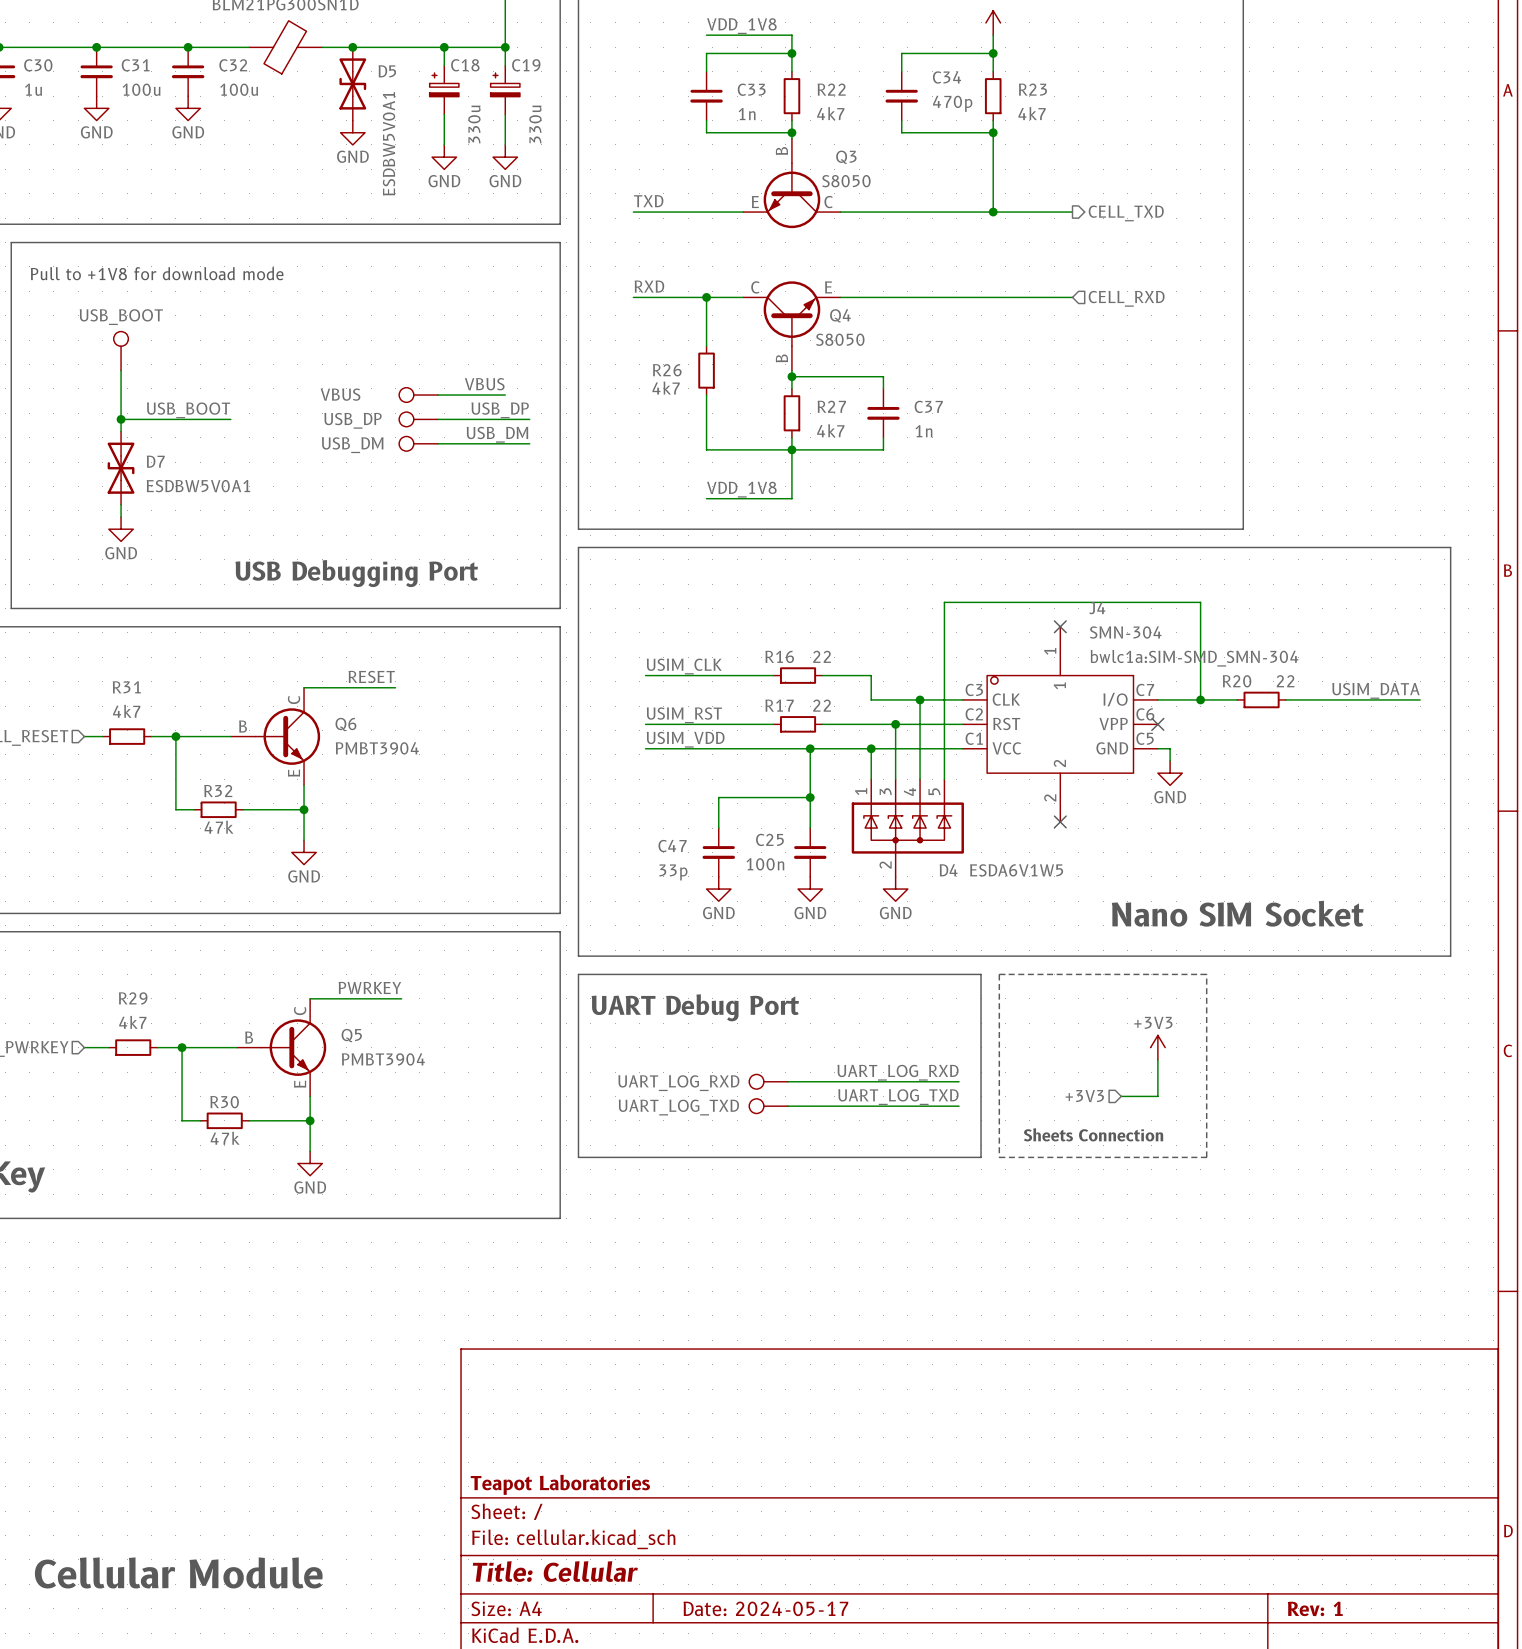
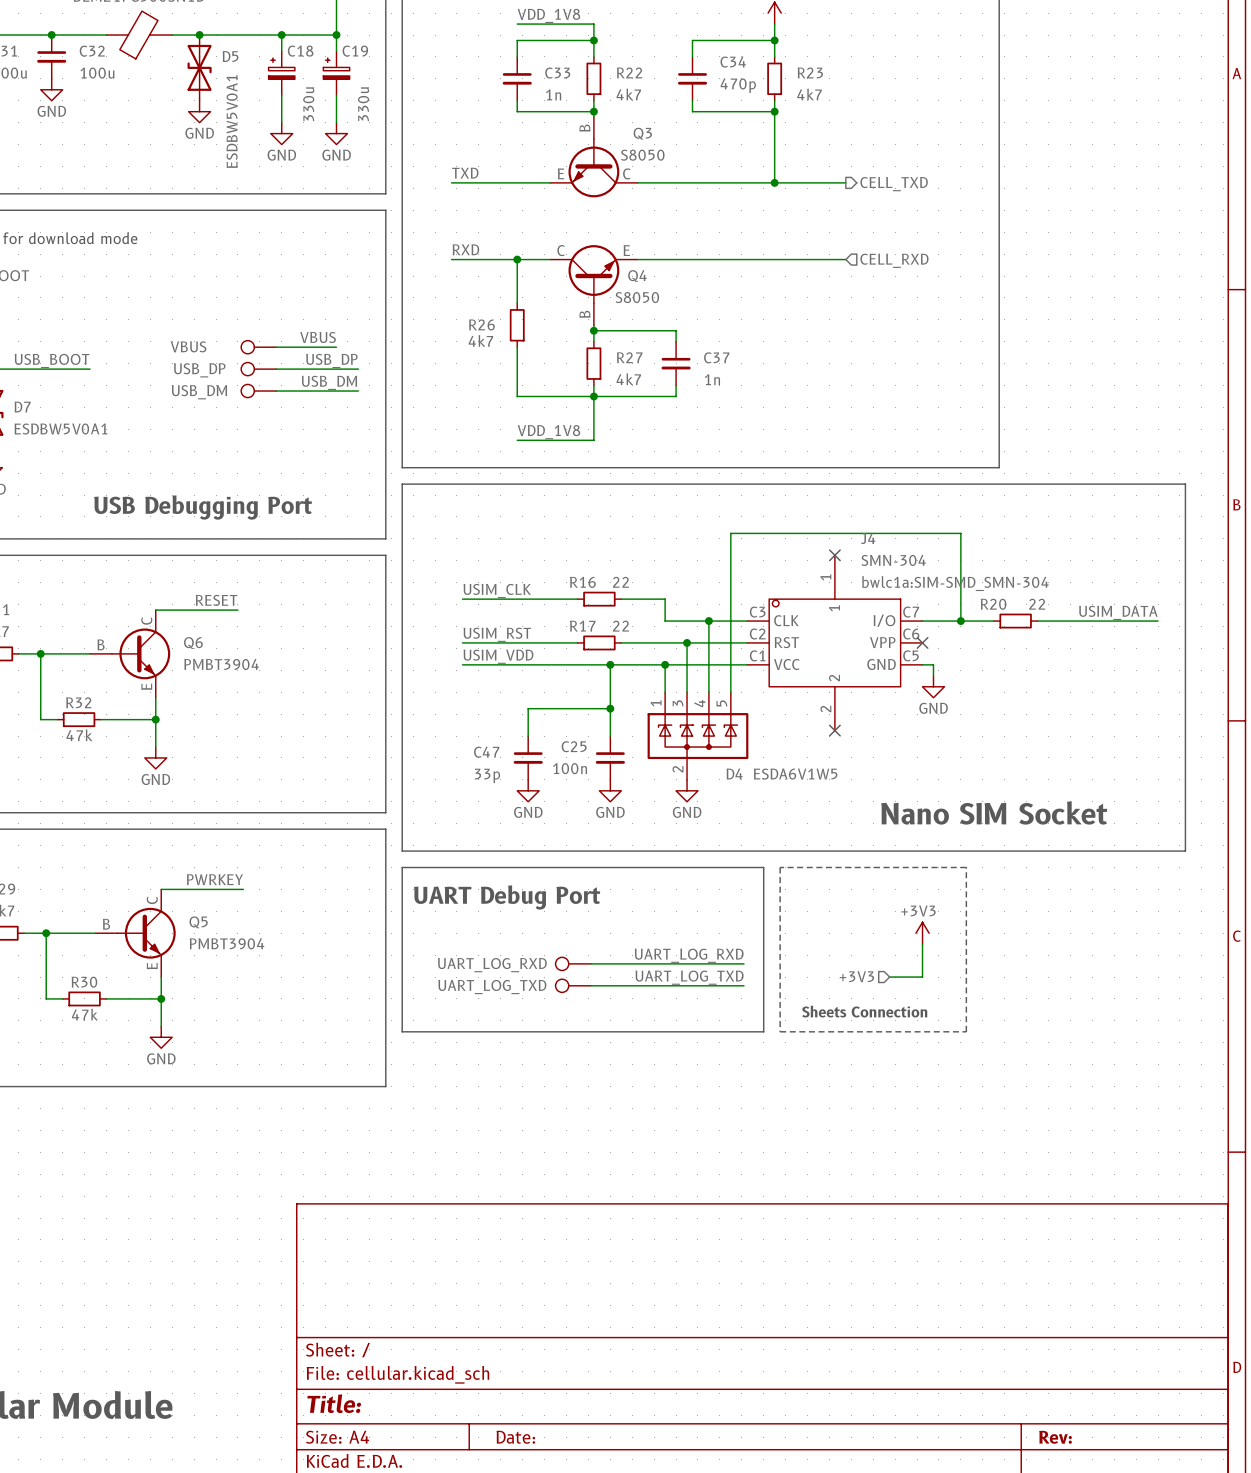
title block: Teapot Laboratories (560, 1484) -> none
title block: Title: Cellular (555, 1571) -> Title: (334, 1403)
title block: Date: 2024-05-17 (765, 1608) -> Date: (515, 1437)
title block: Rev: 1 (1315, 1608) -> Rev: (1055, 1437)

